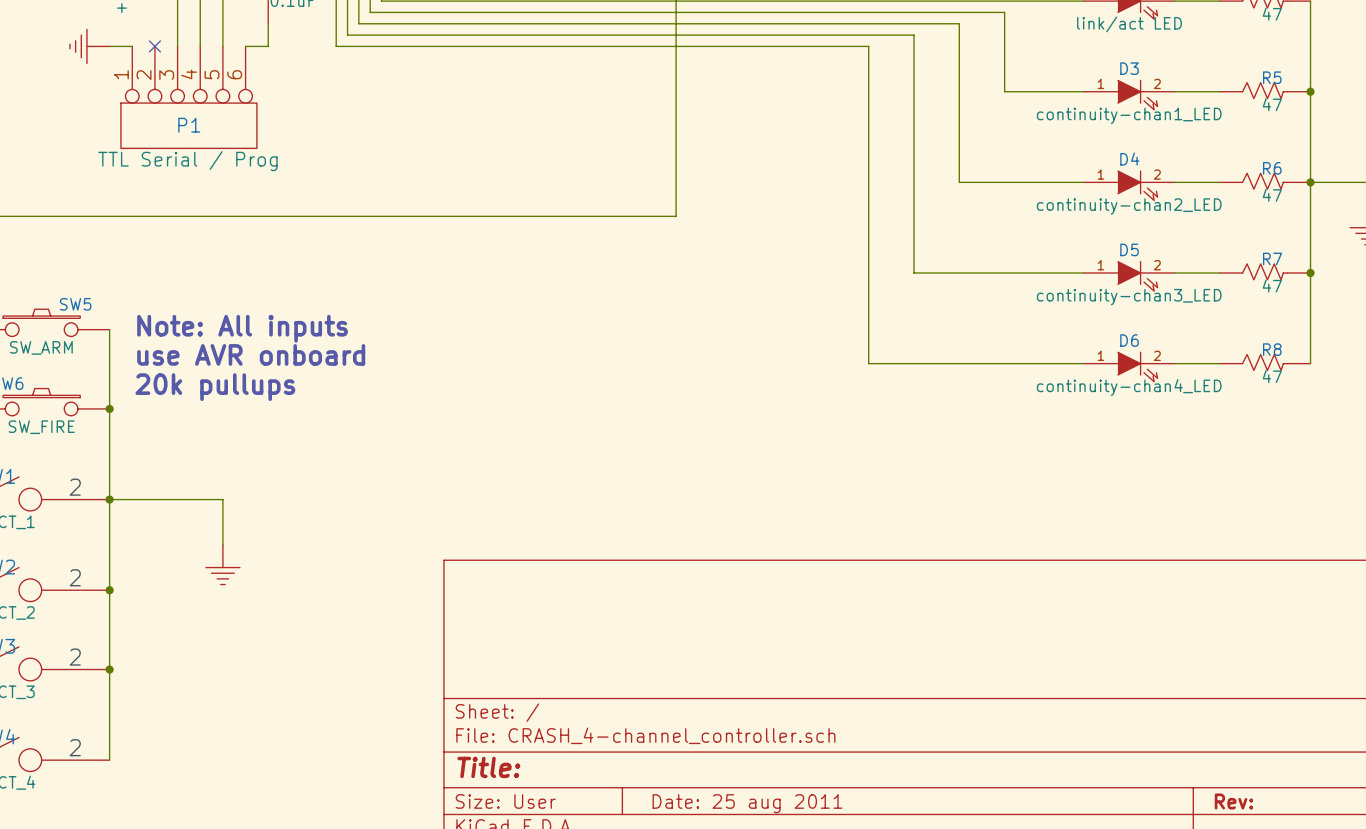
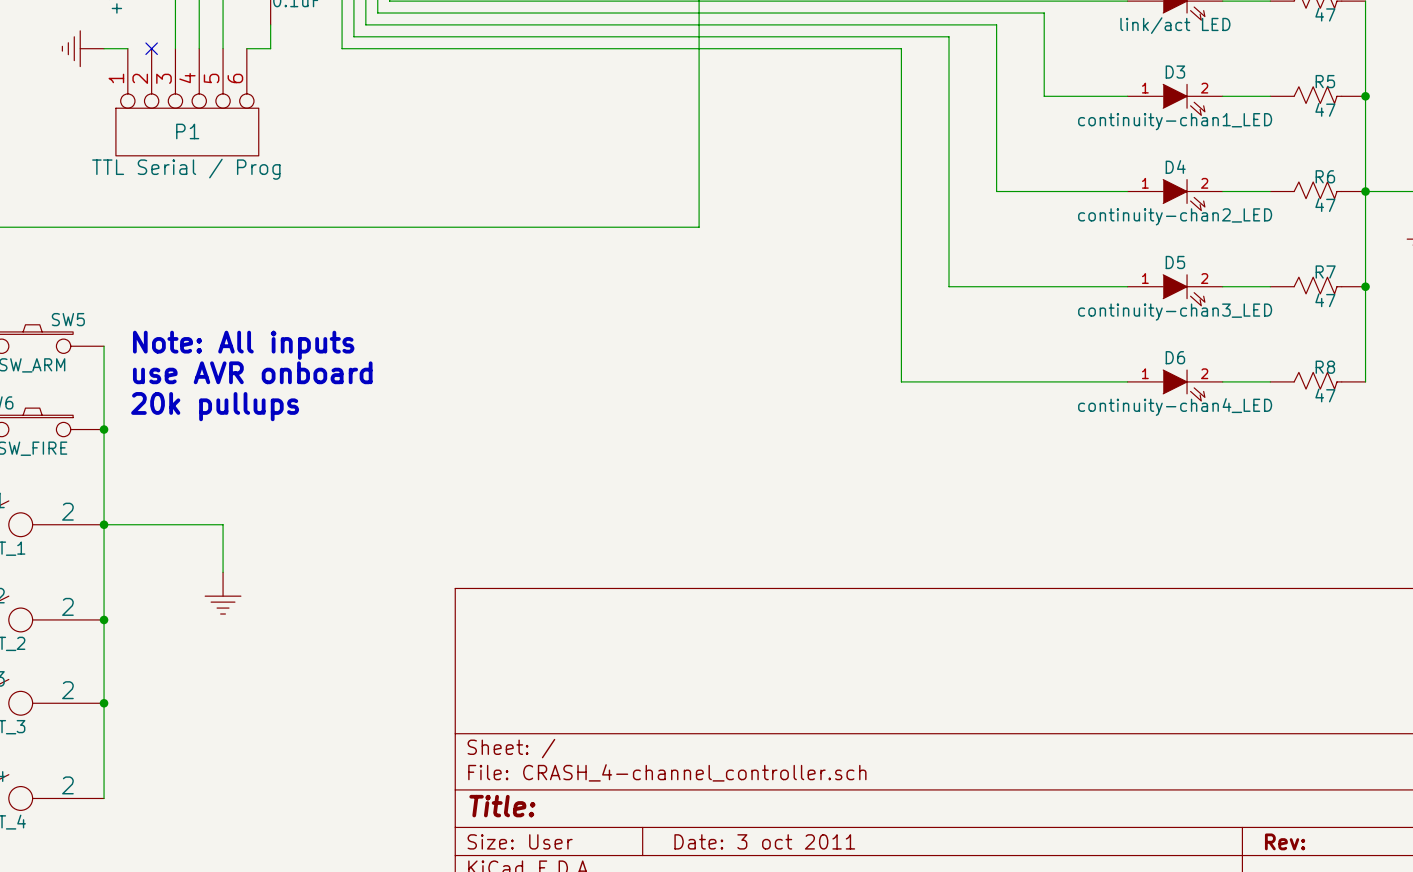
title block: Date: 25 aug 2011 (747, 803) -> Date: 3 oct 2011 (764, 841)

